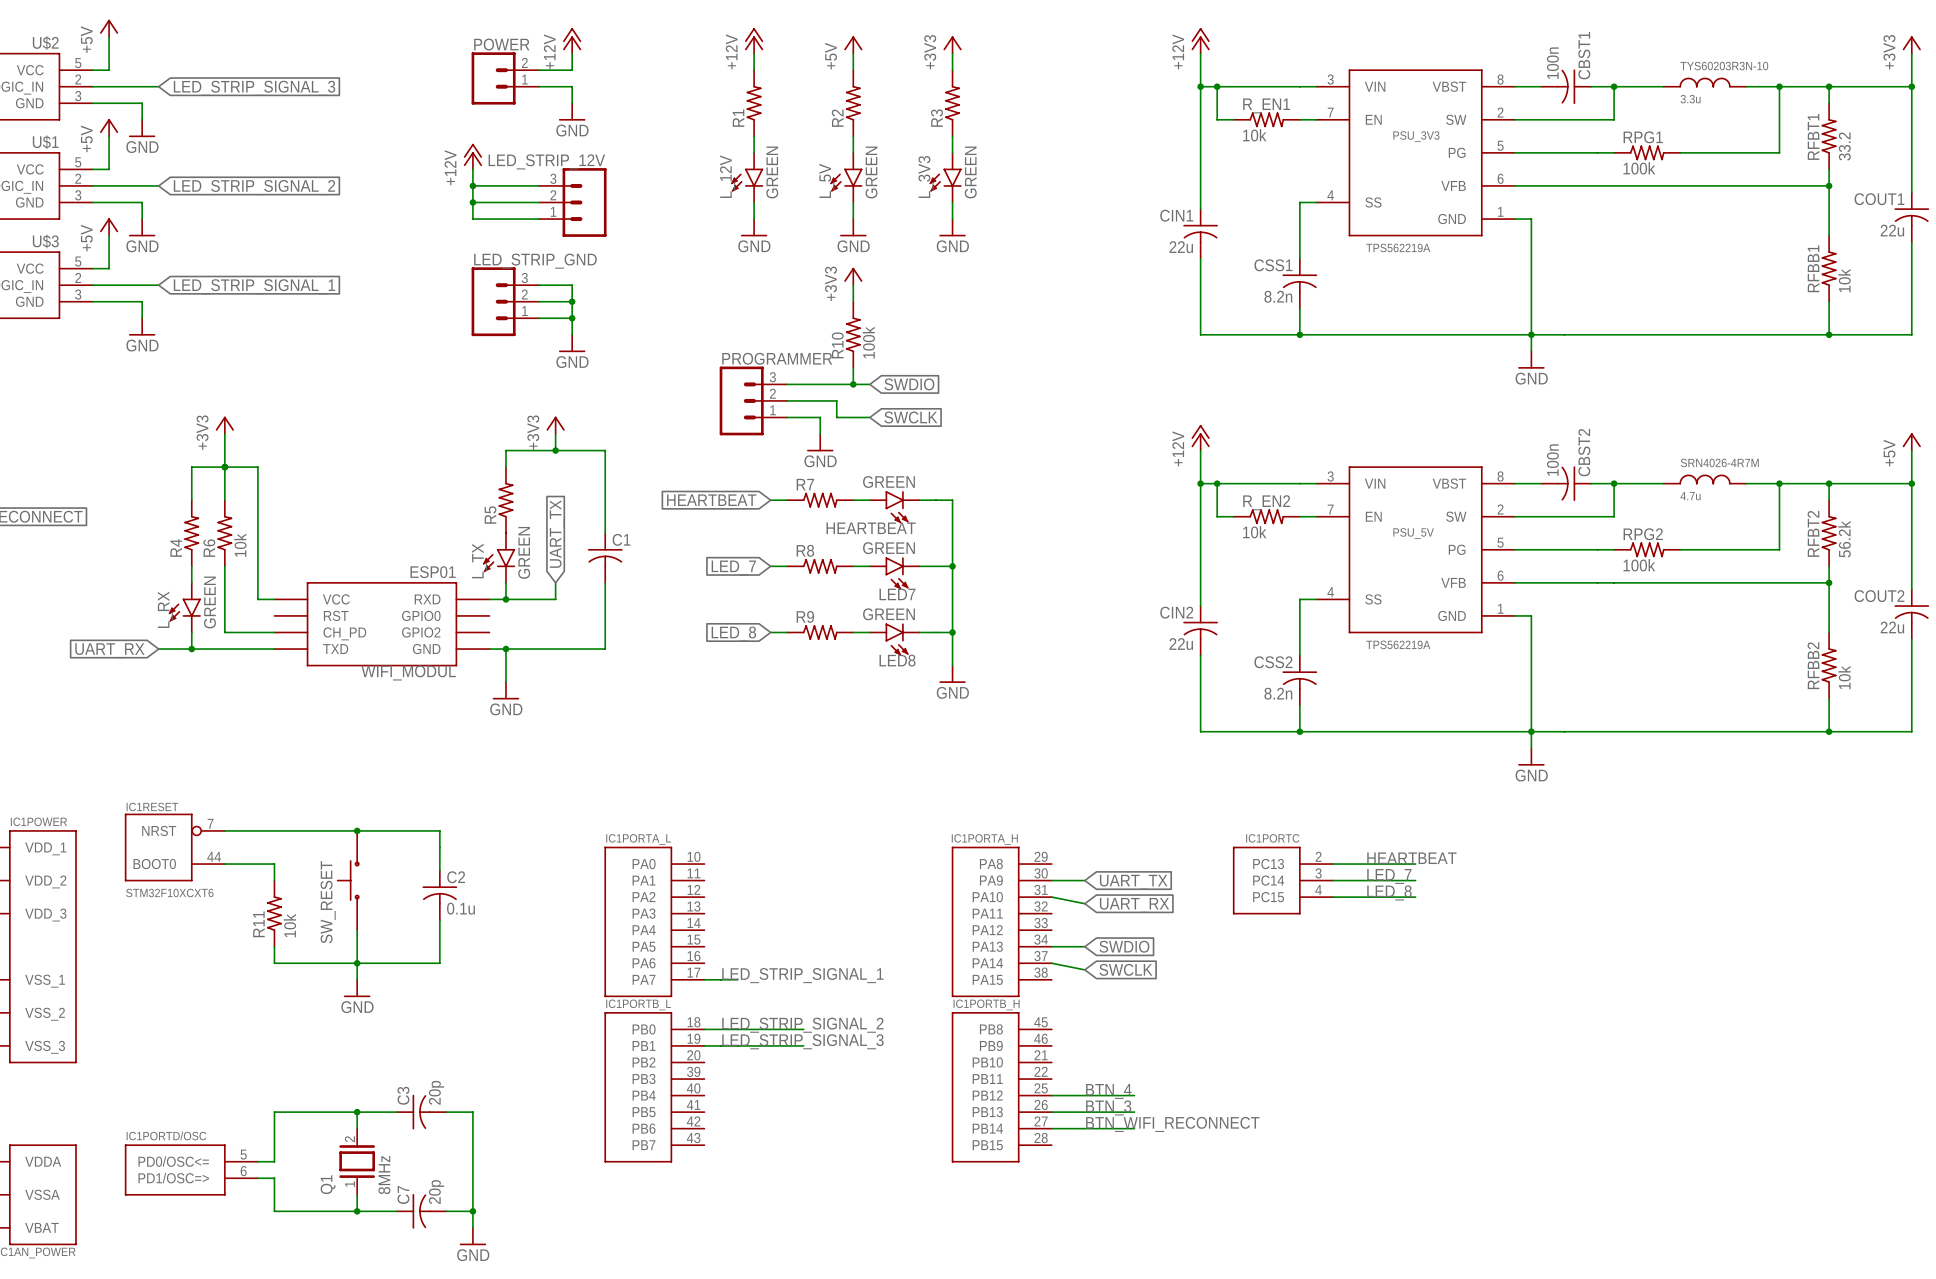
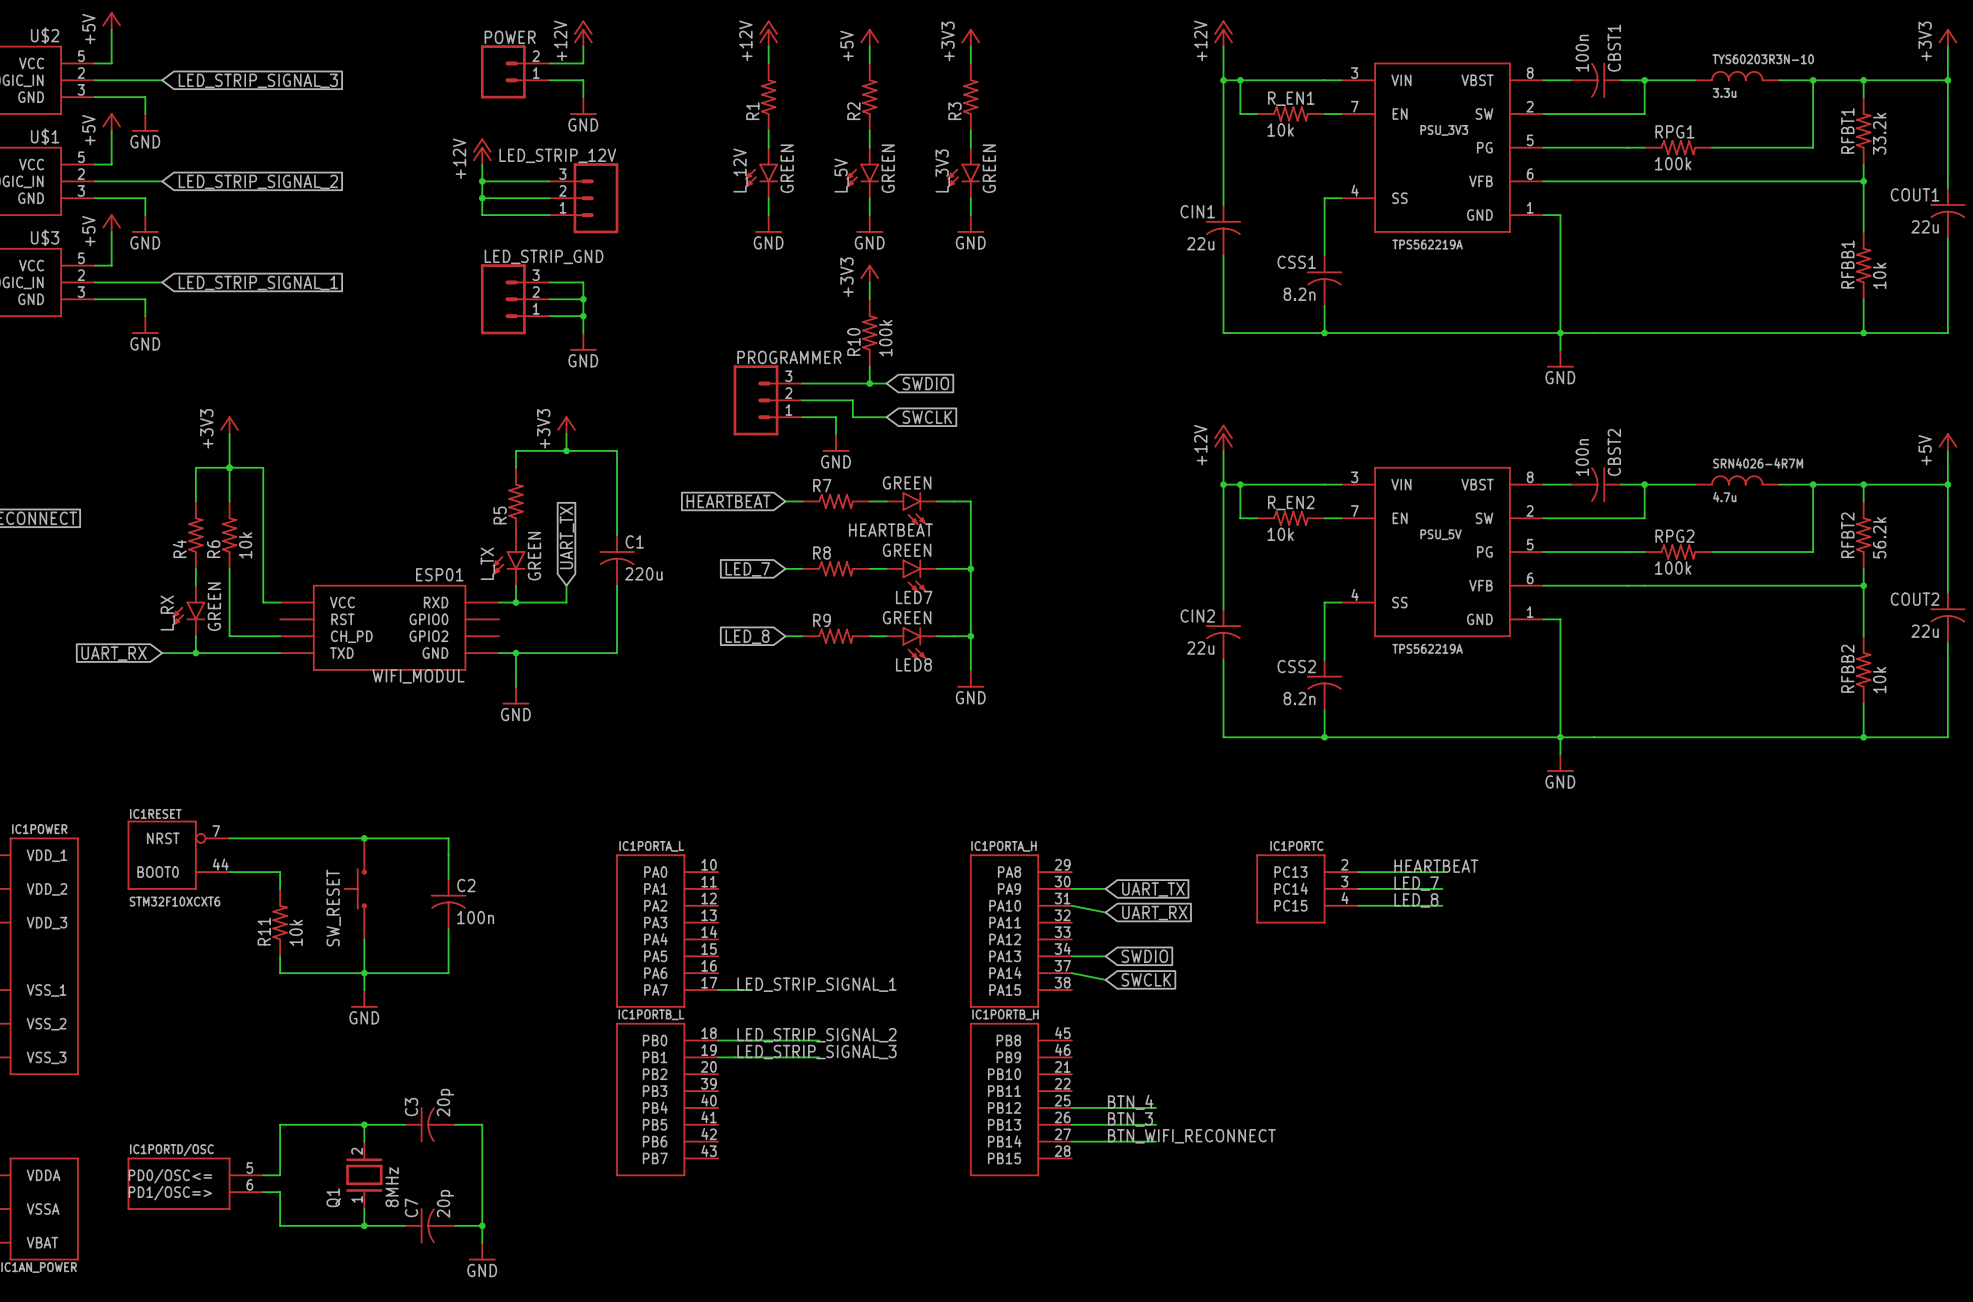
RFBT1 value: 33.2 (1844, 146) -> 33.2k (1879, 133)
C1 value: none -> 220u (643, 573)
C2 value: 0.1u (460, 908) -> 100n (475, 917)

